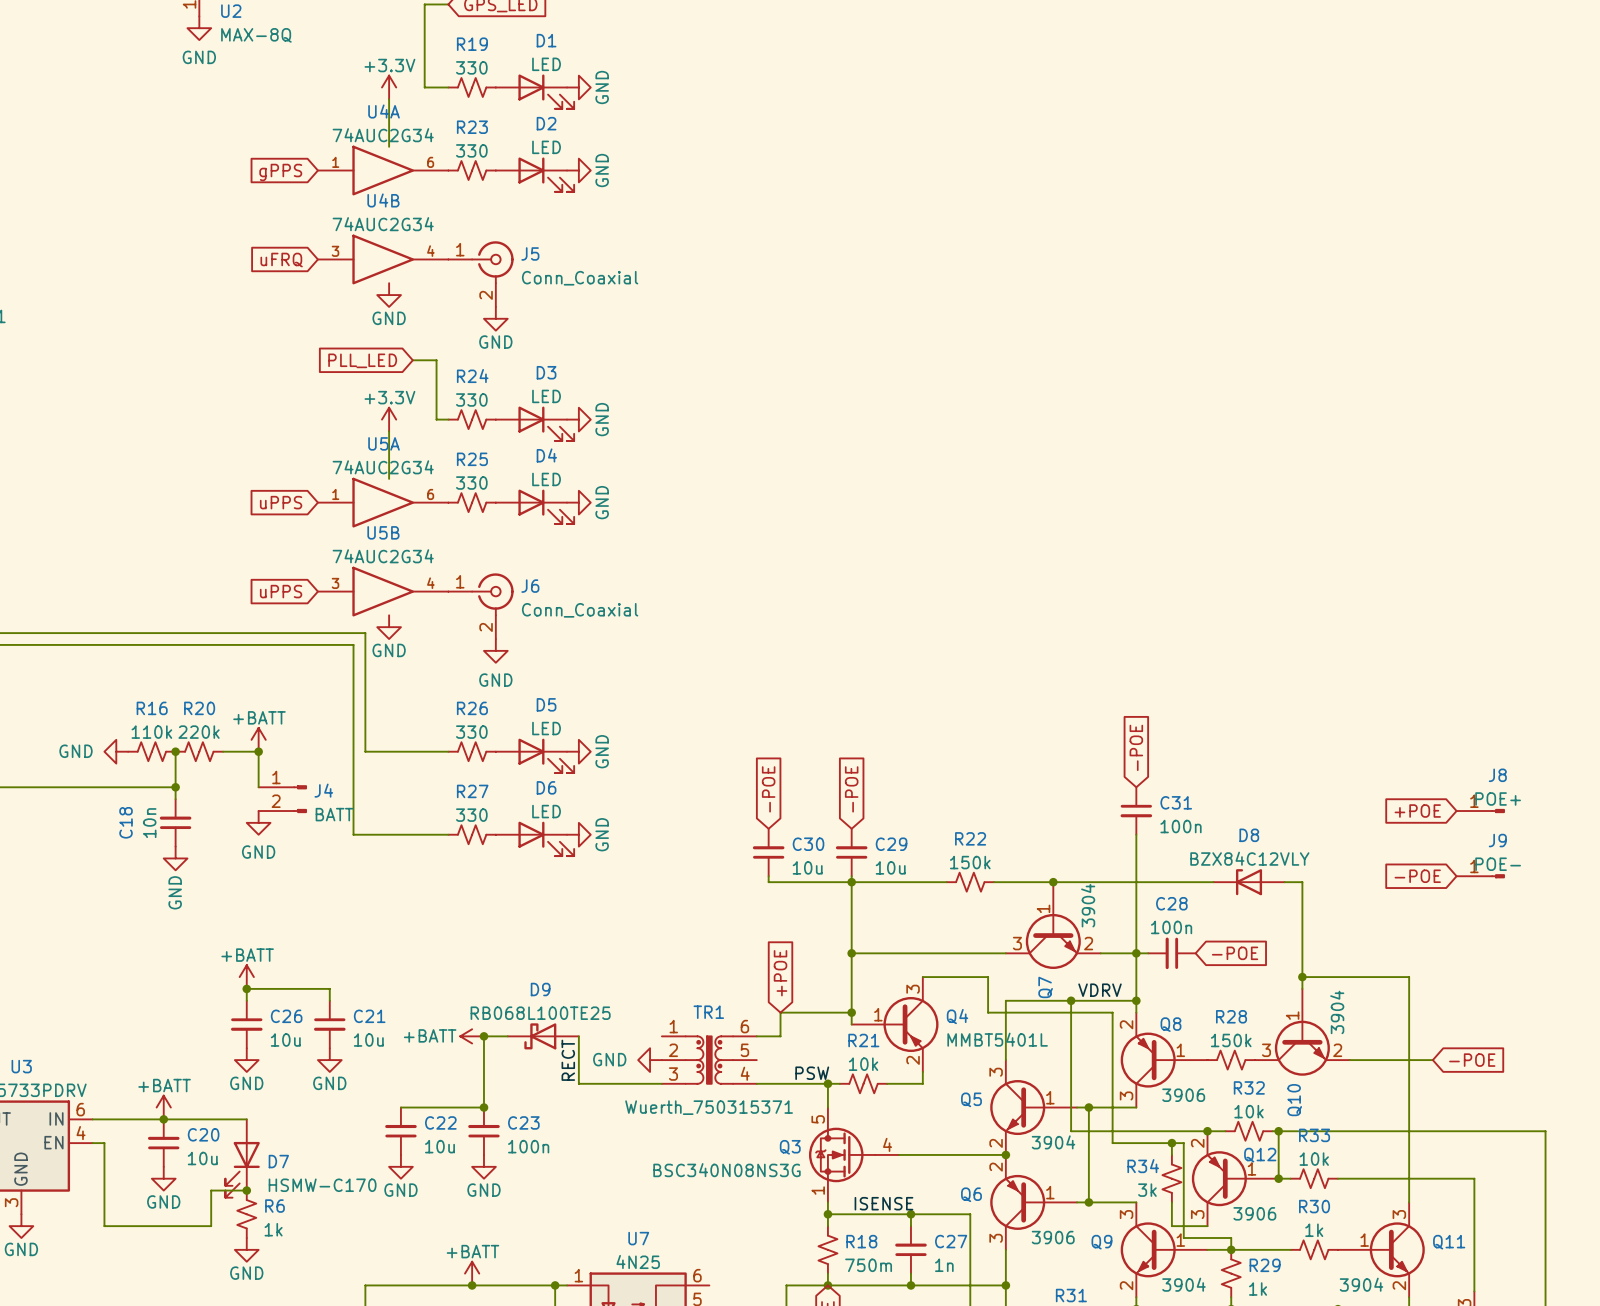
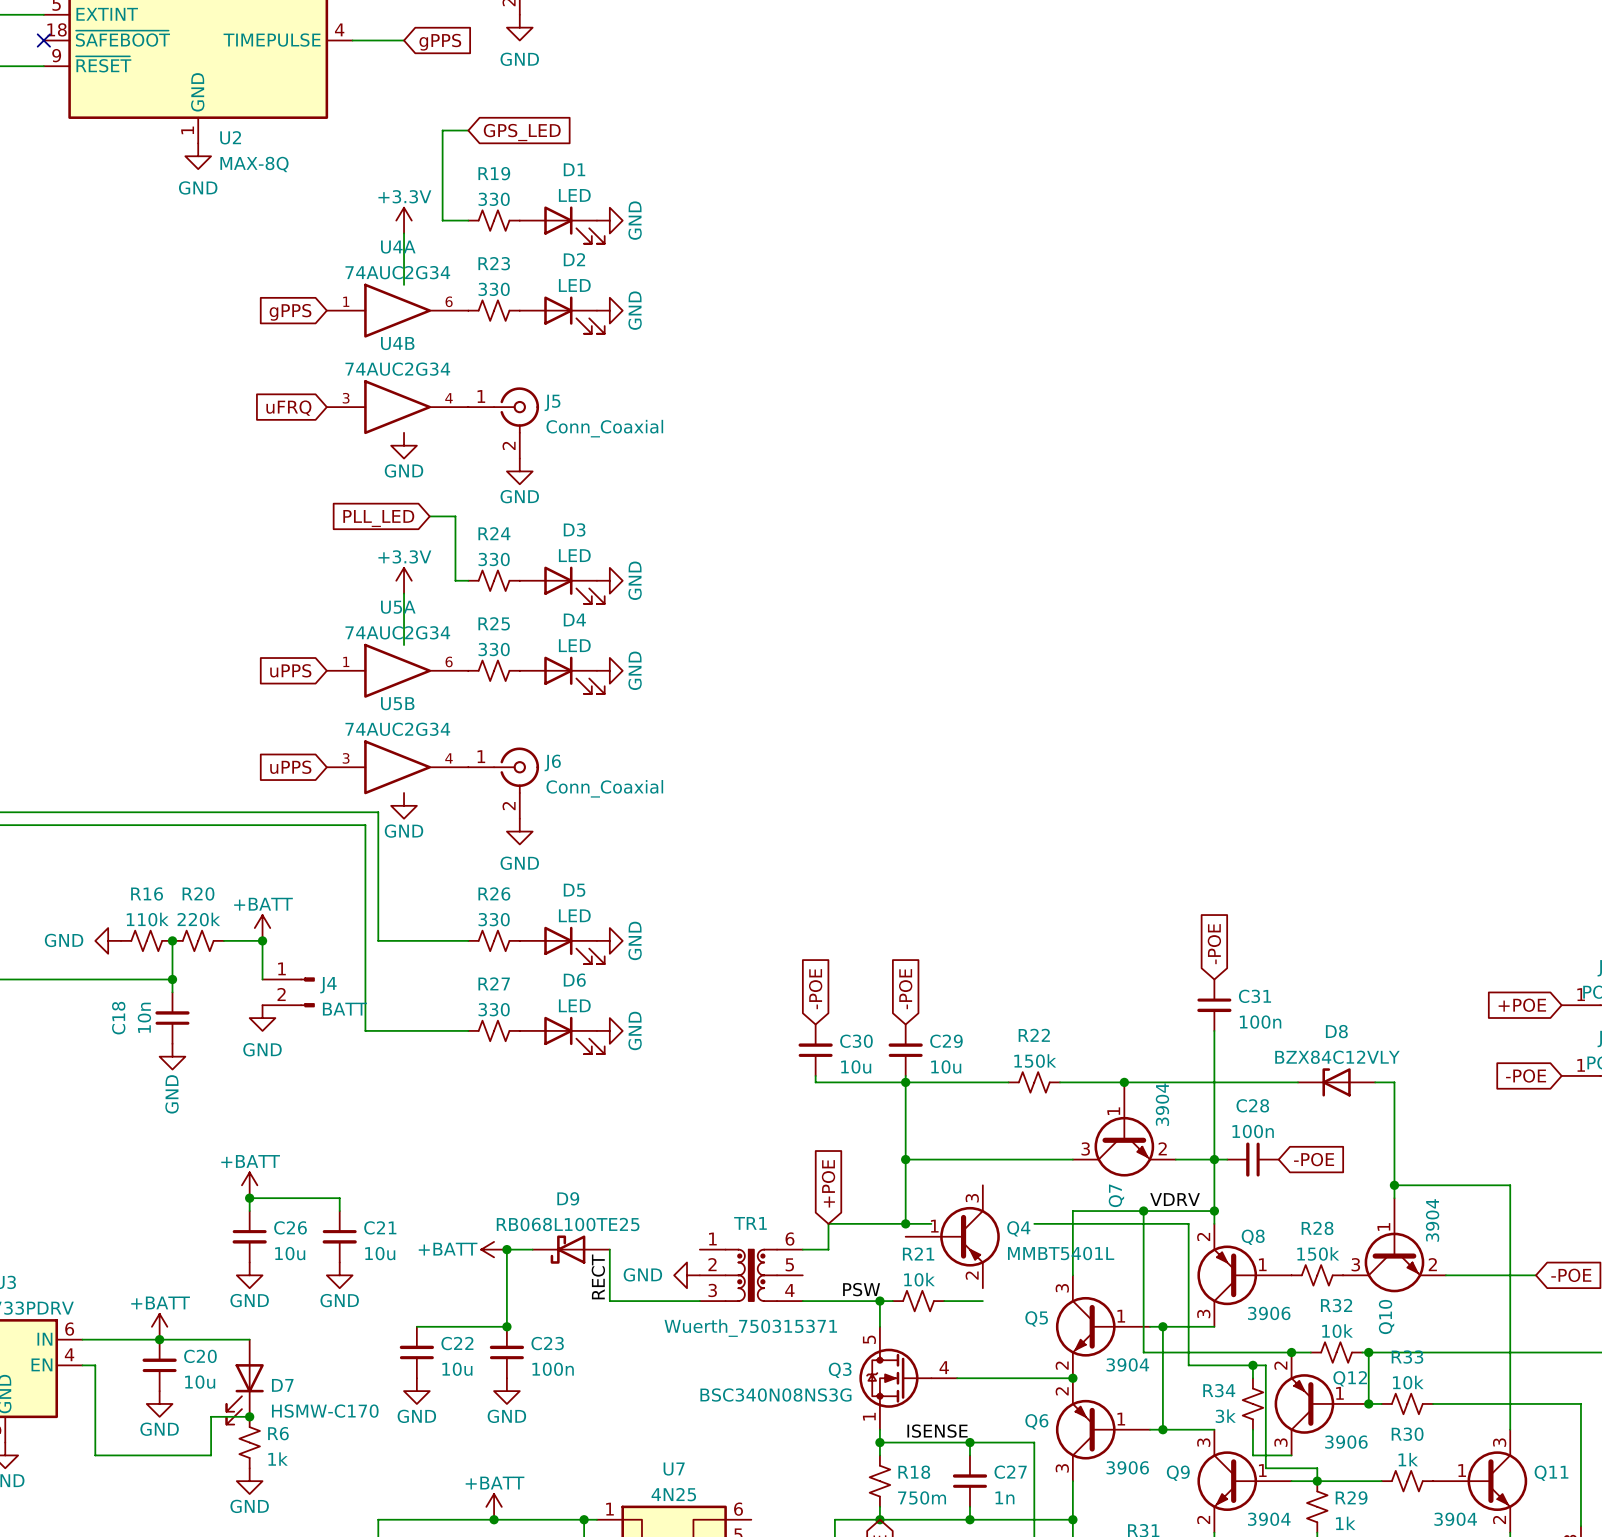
wire: (922, 977) (988, 977) (988, 1012) -> (1034, 1223) (1053, 1223)
wire: (851, 1012) (851, 1024) -> (905, 1223) (931, 1223)
wire: (922, 1071) (922, 1083) -> none

